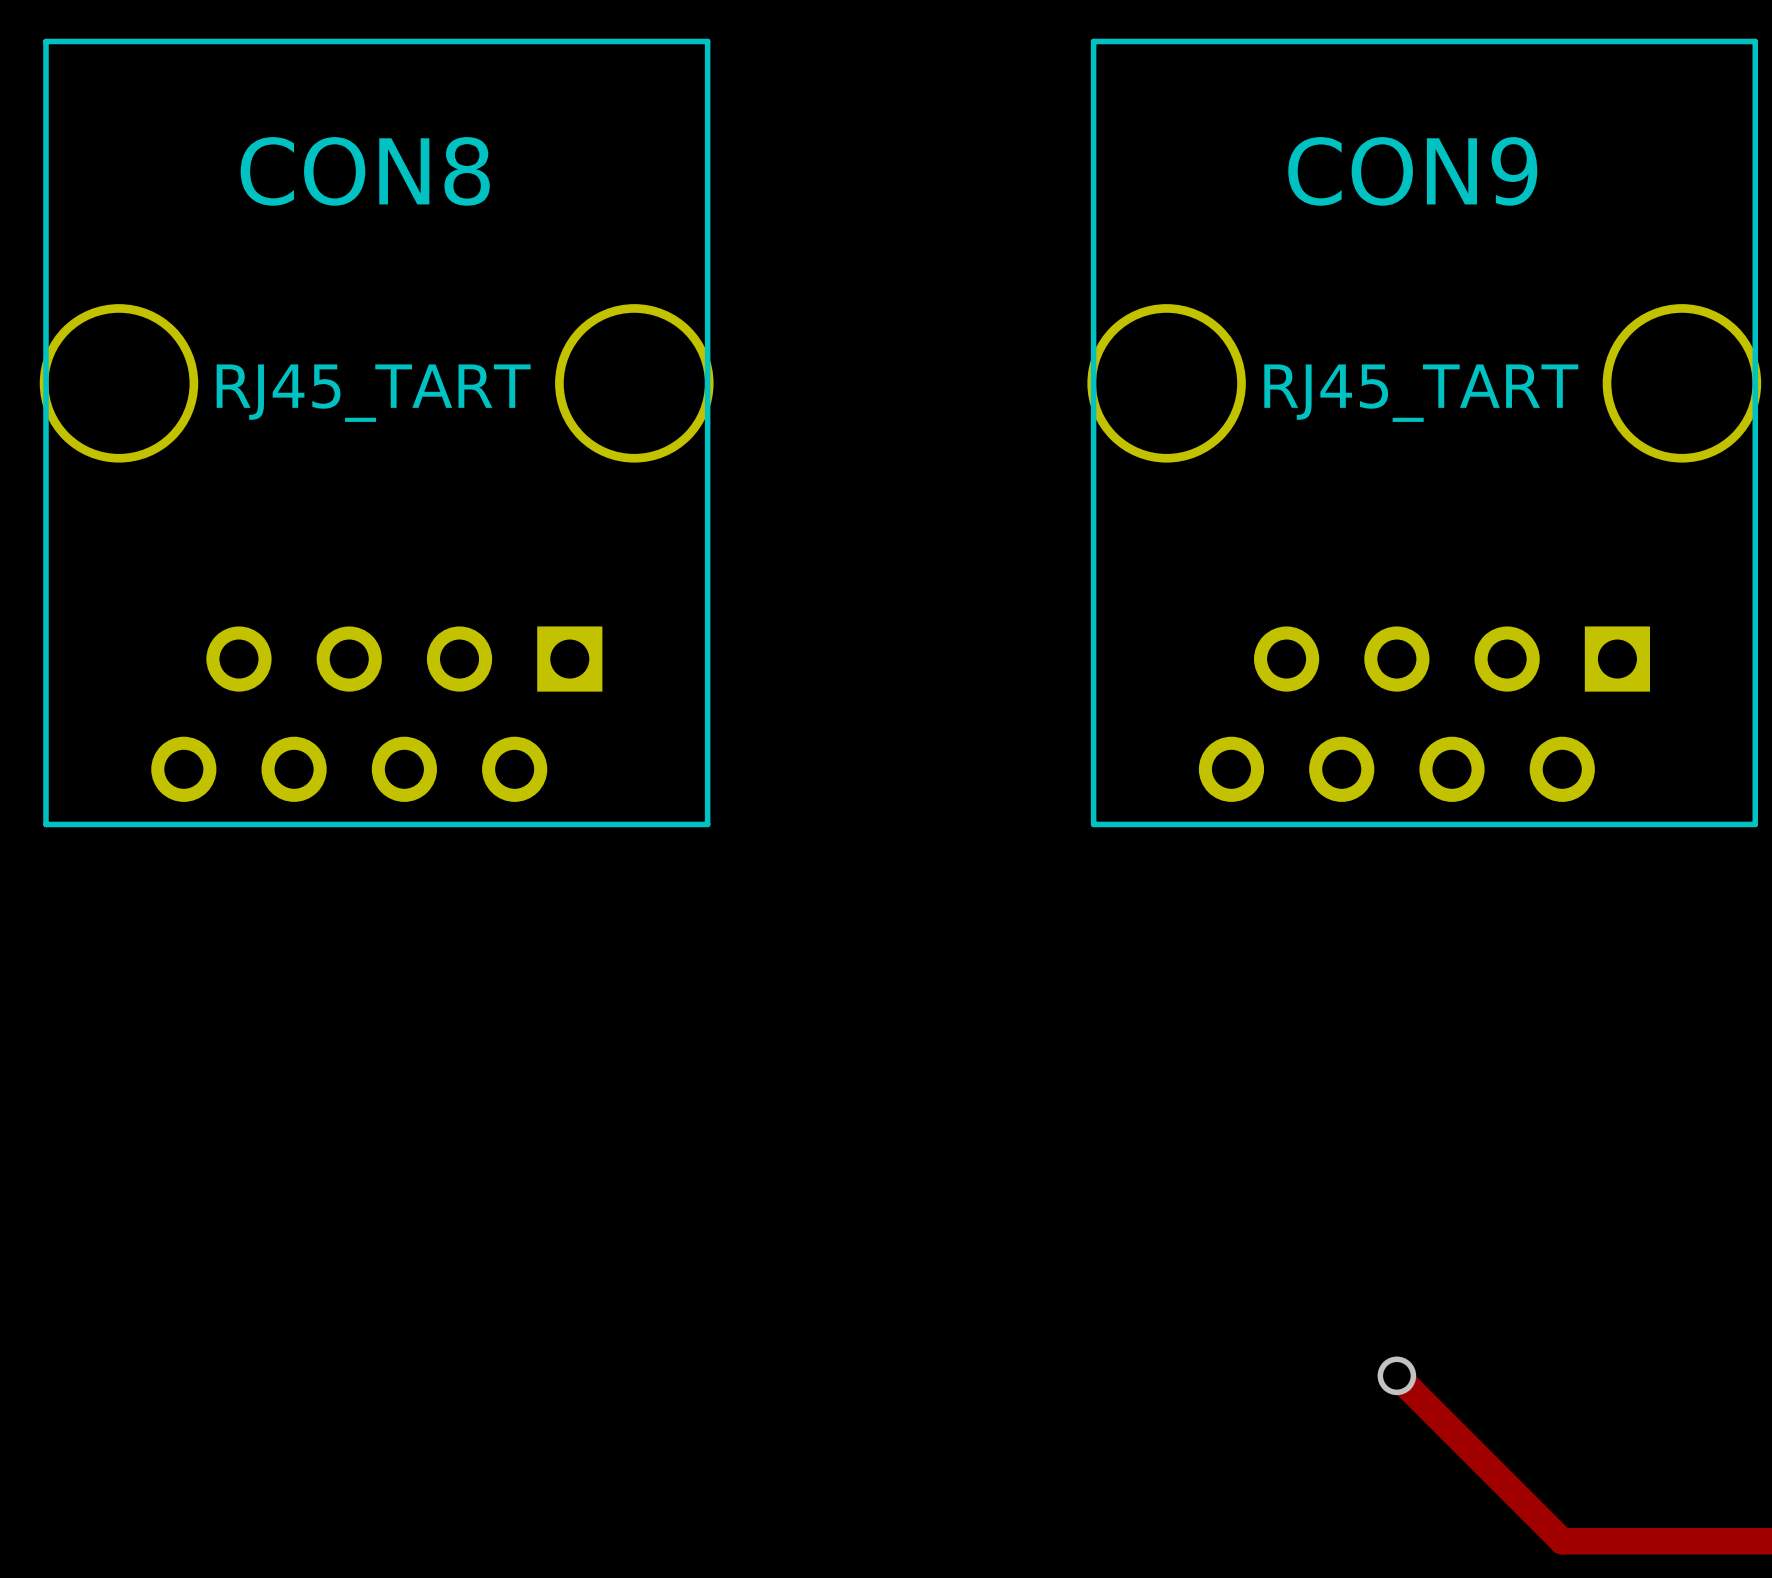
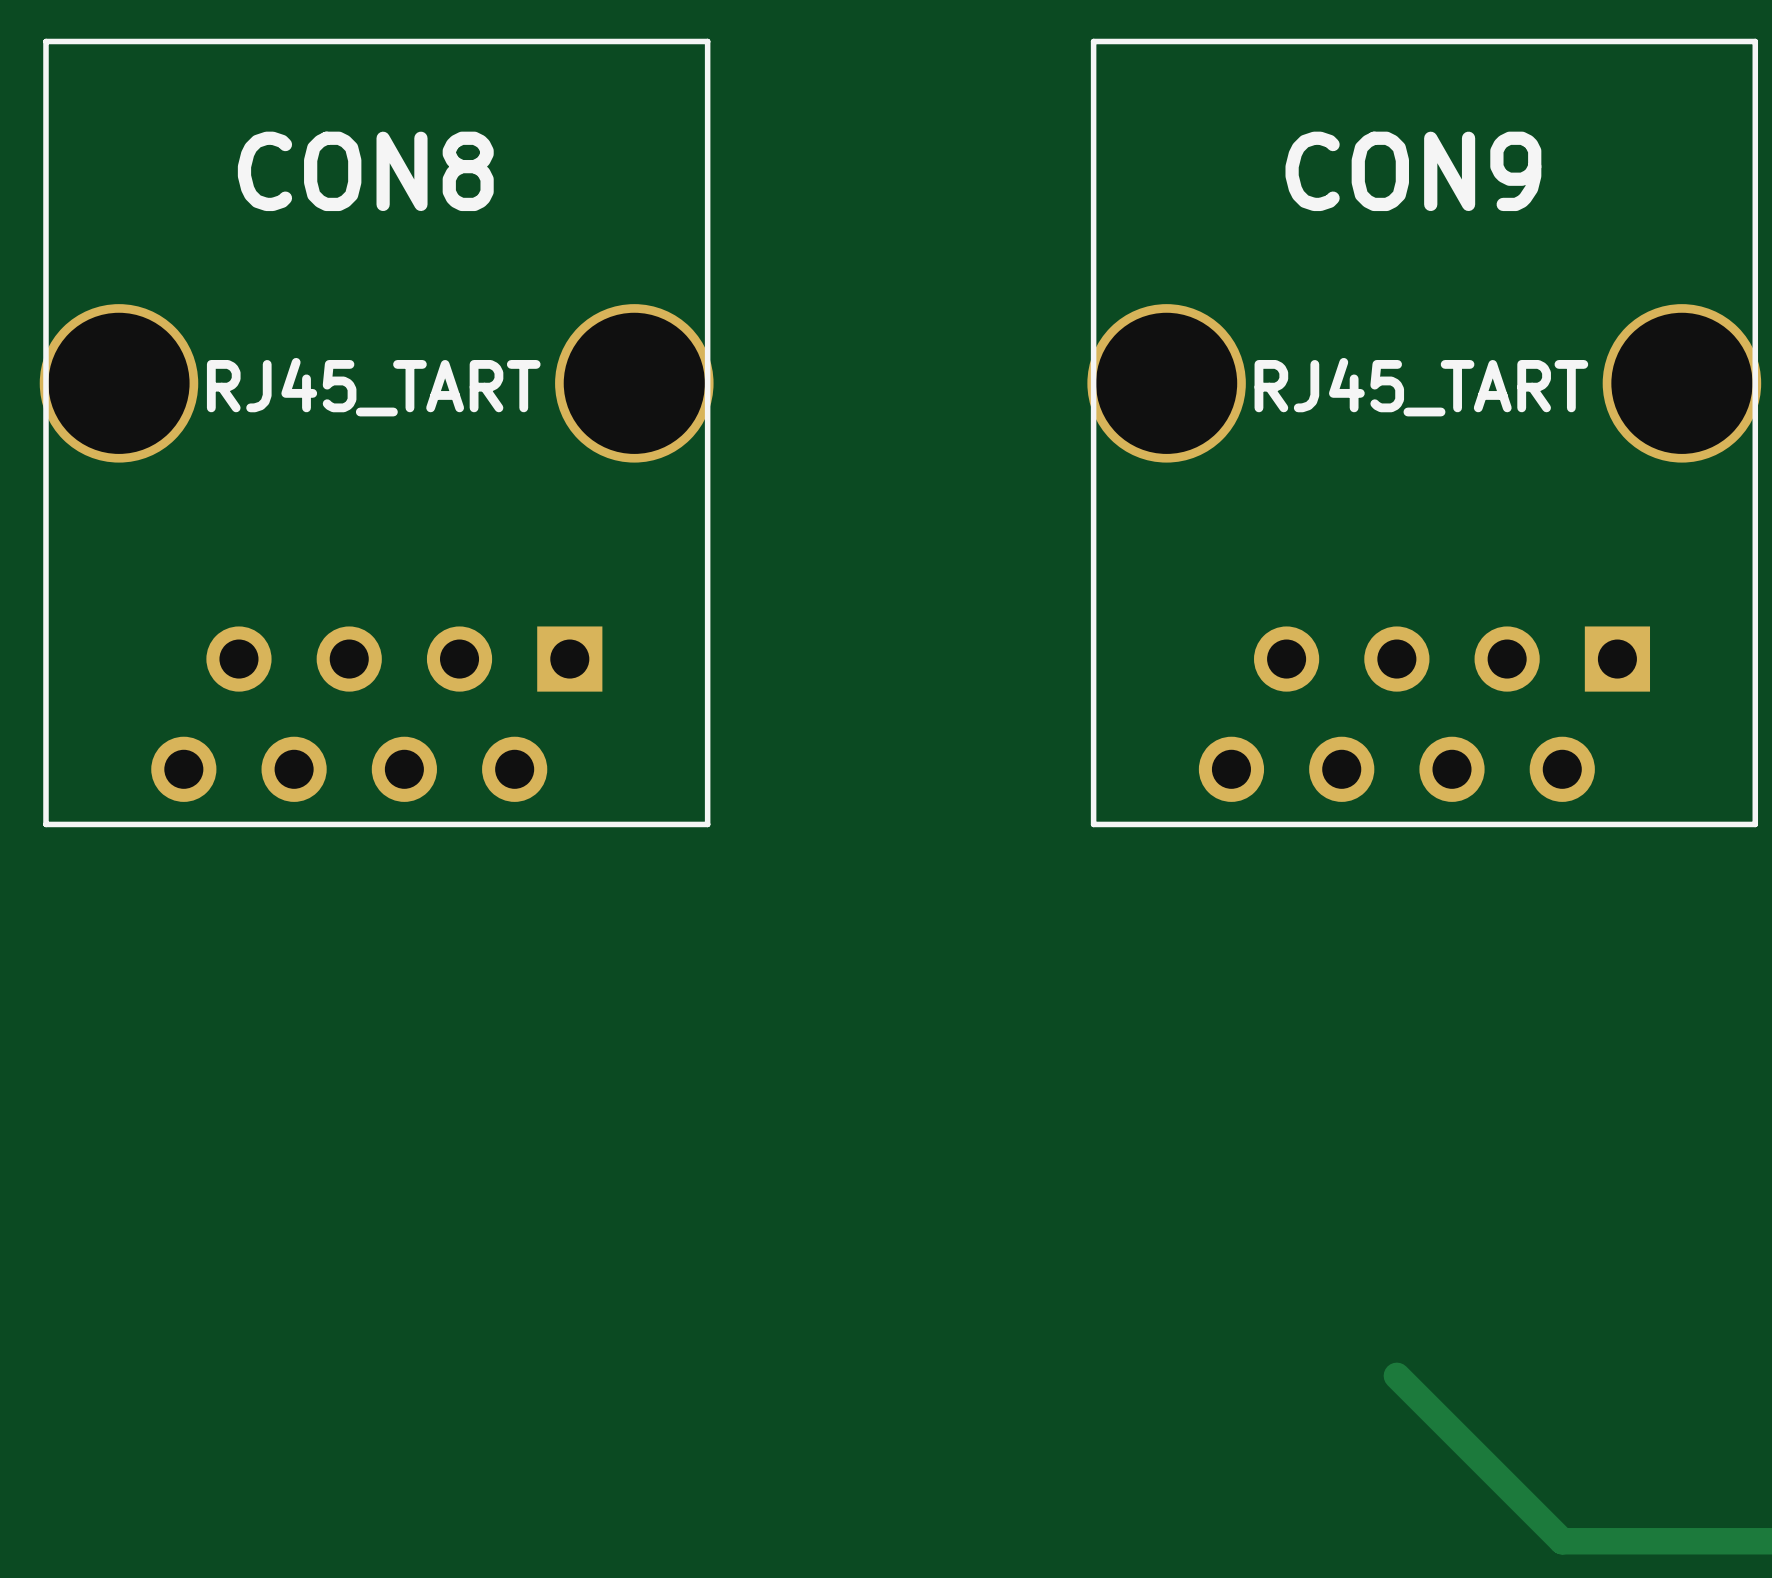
via: (1396, 1375) -> none

